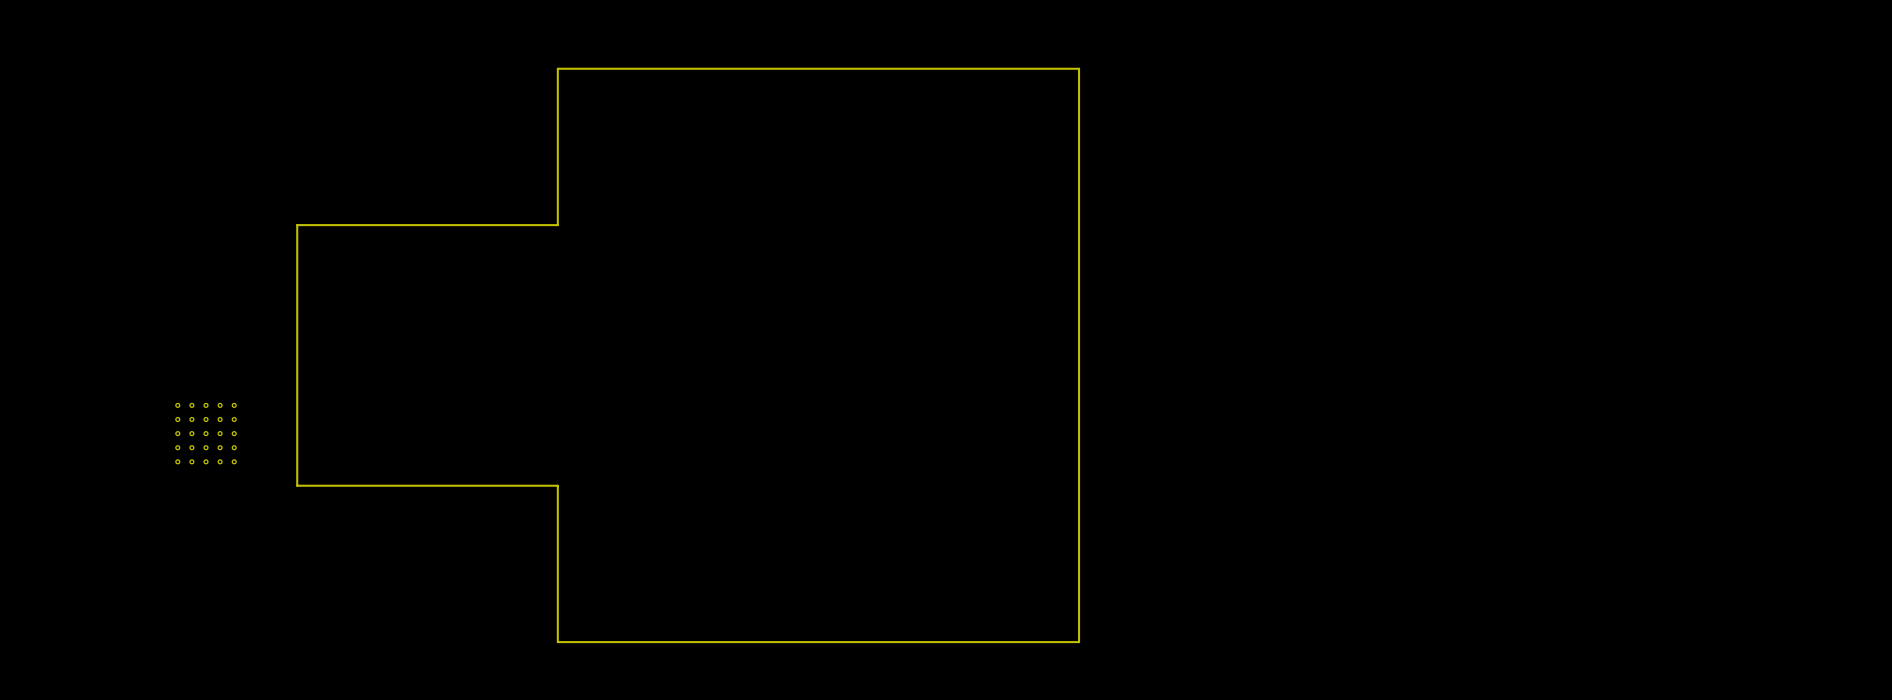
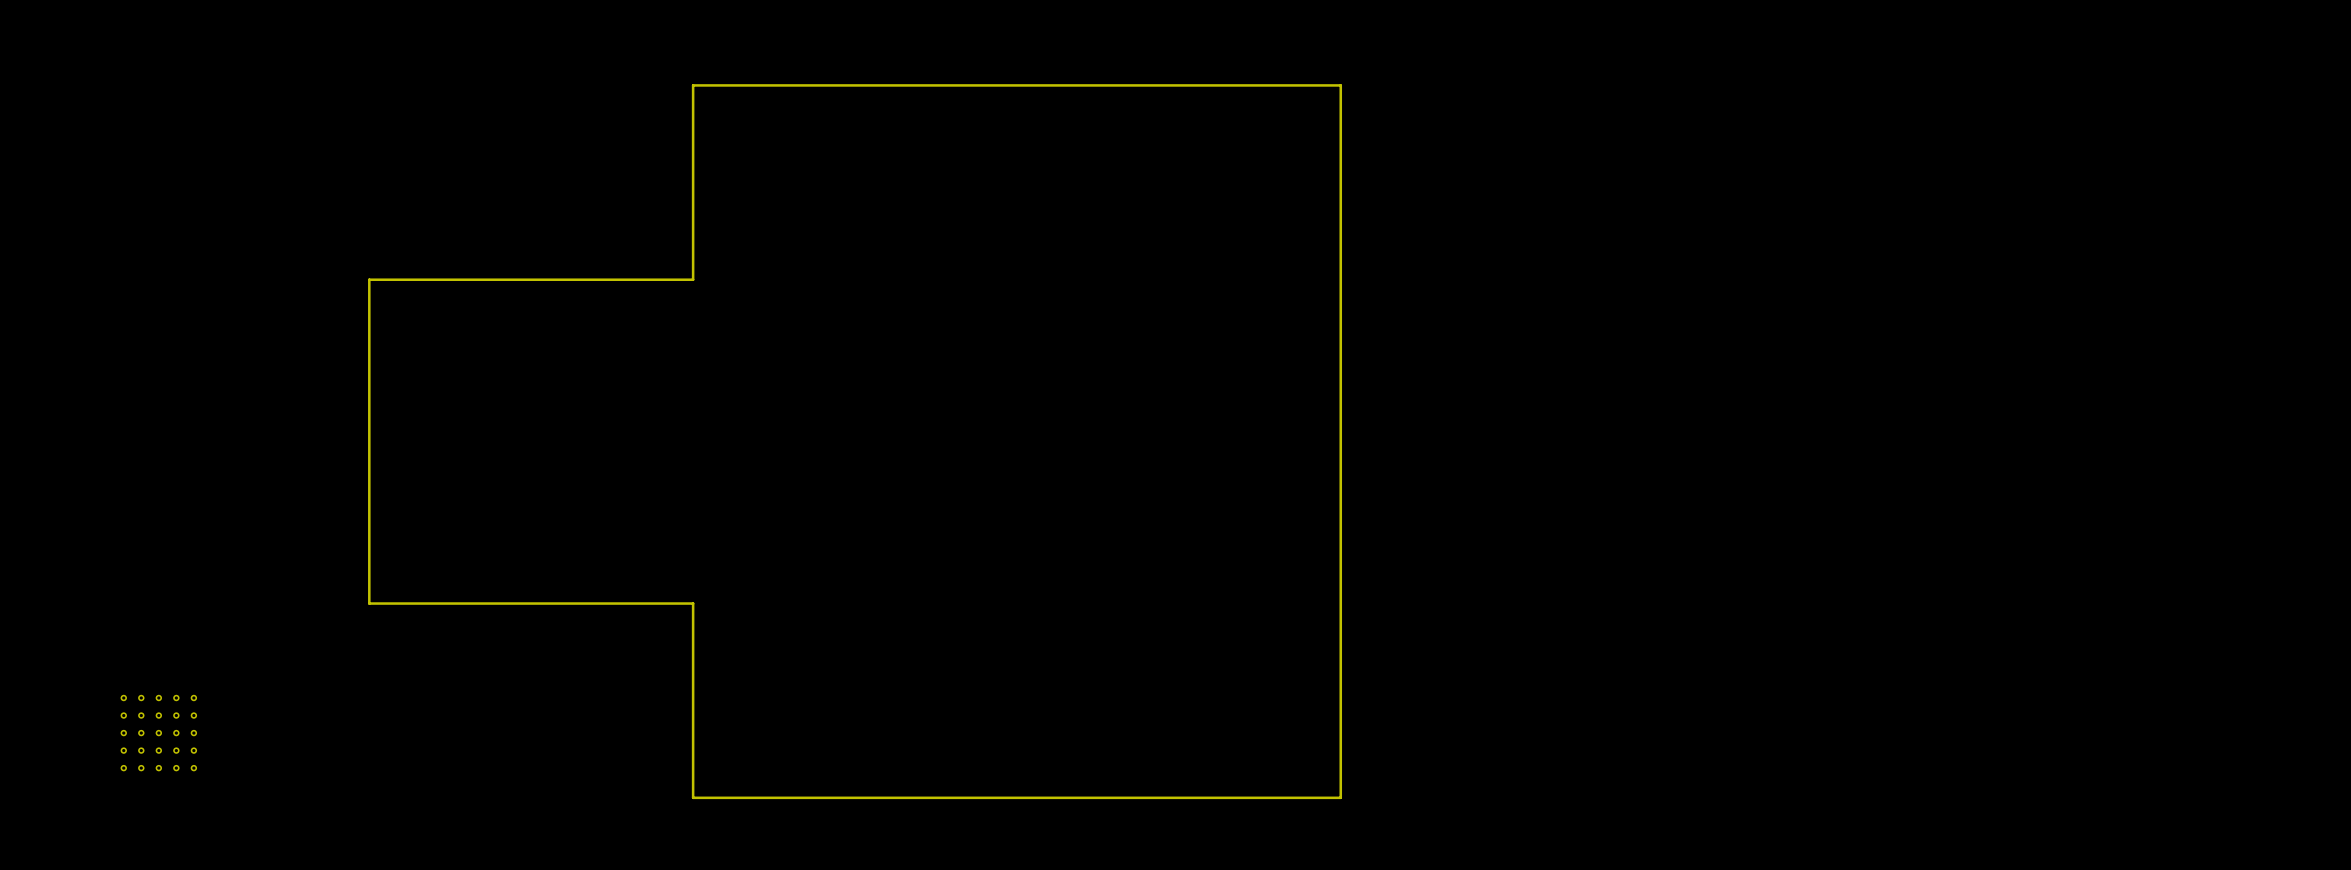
part position: (206, 433) -> (158, 733)

